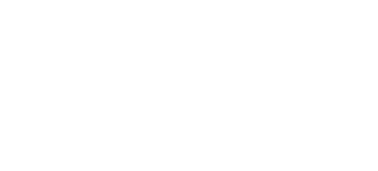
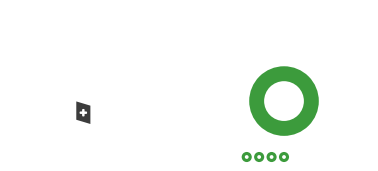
drawing: none -> [76, 101, 91, 124]
part: none -> (284, 101)
via: none -> (246, 157)
via: none -> (259, 157)
via: none -> (271, 157)
via: none -> (284, 157)

